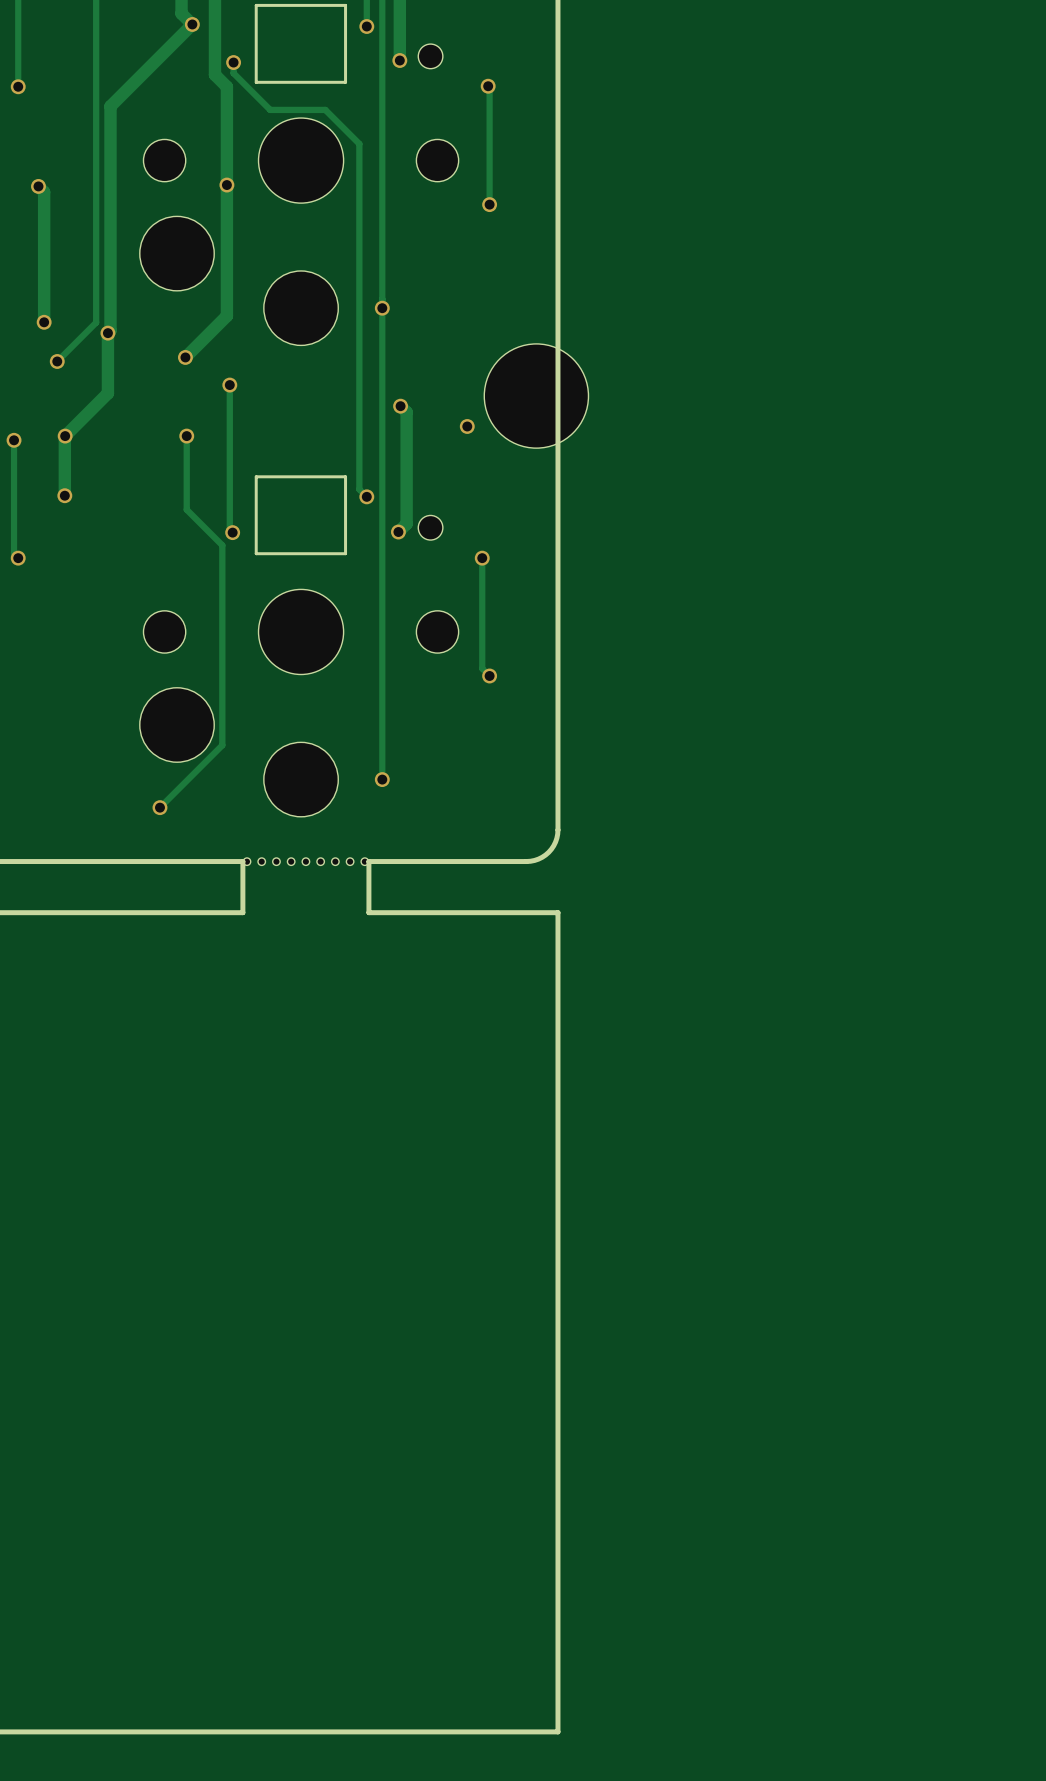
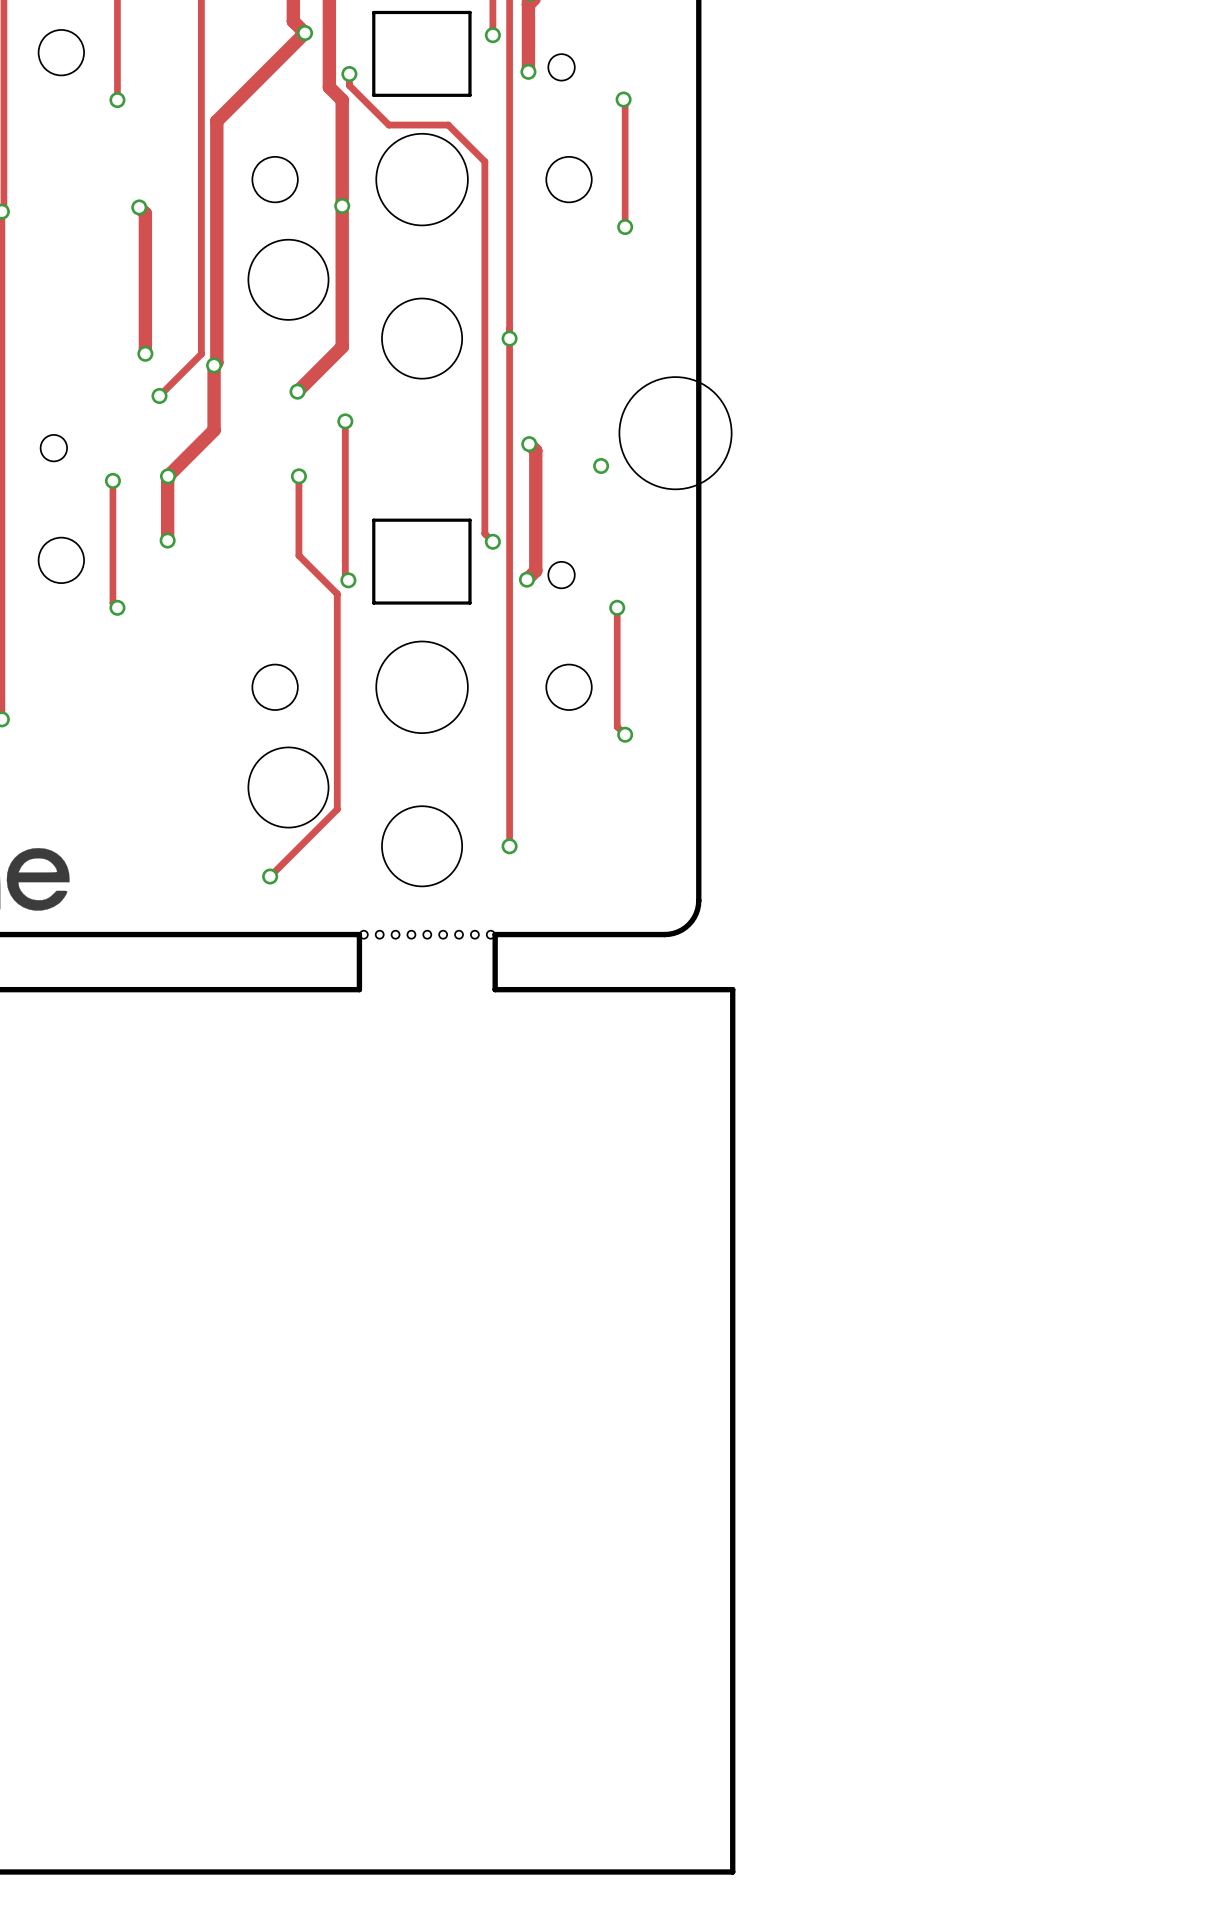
board edge: (557, 912) (557, 1731) -> (698, 989) (732, 989) (732, 1871) (698, 1871)

